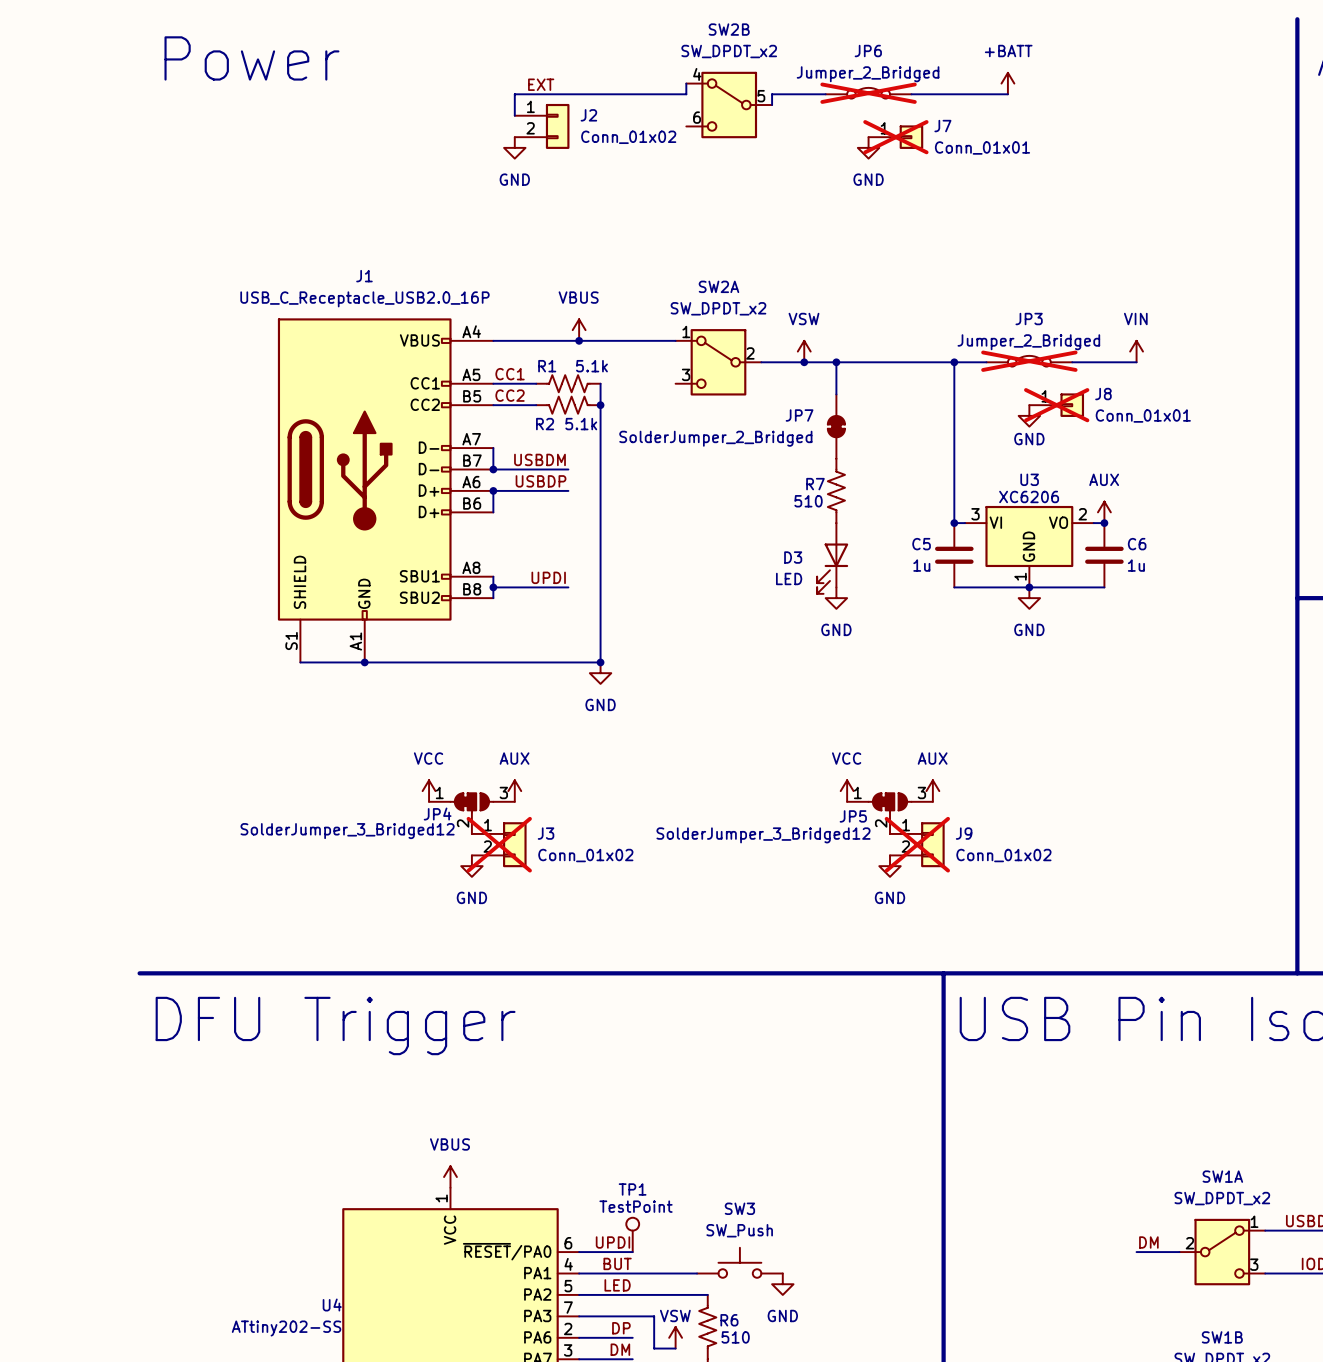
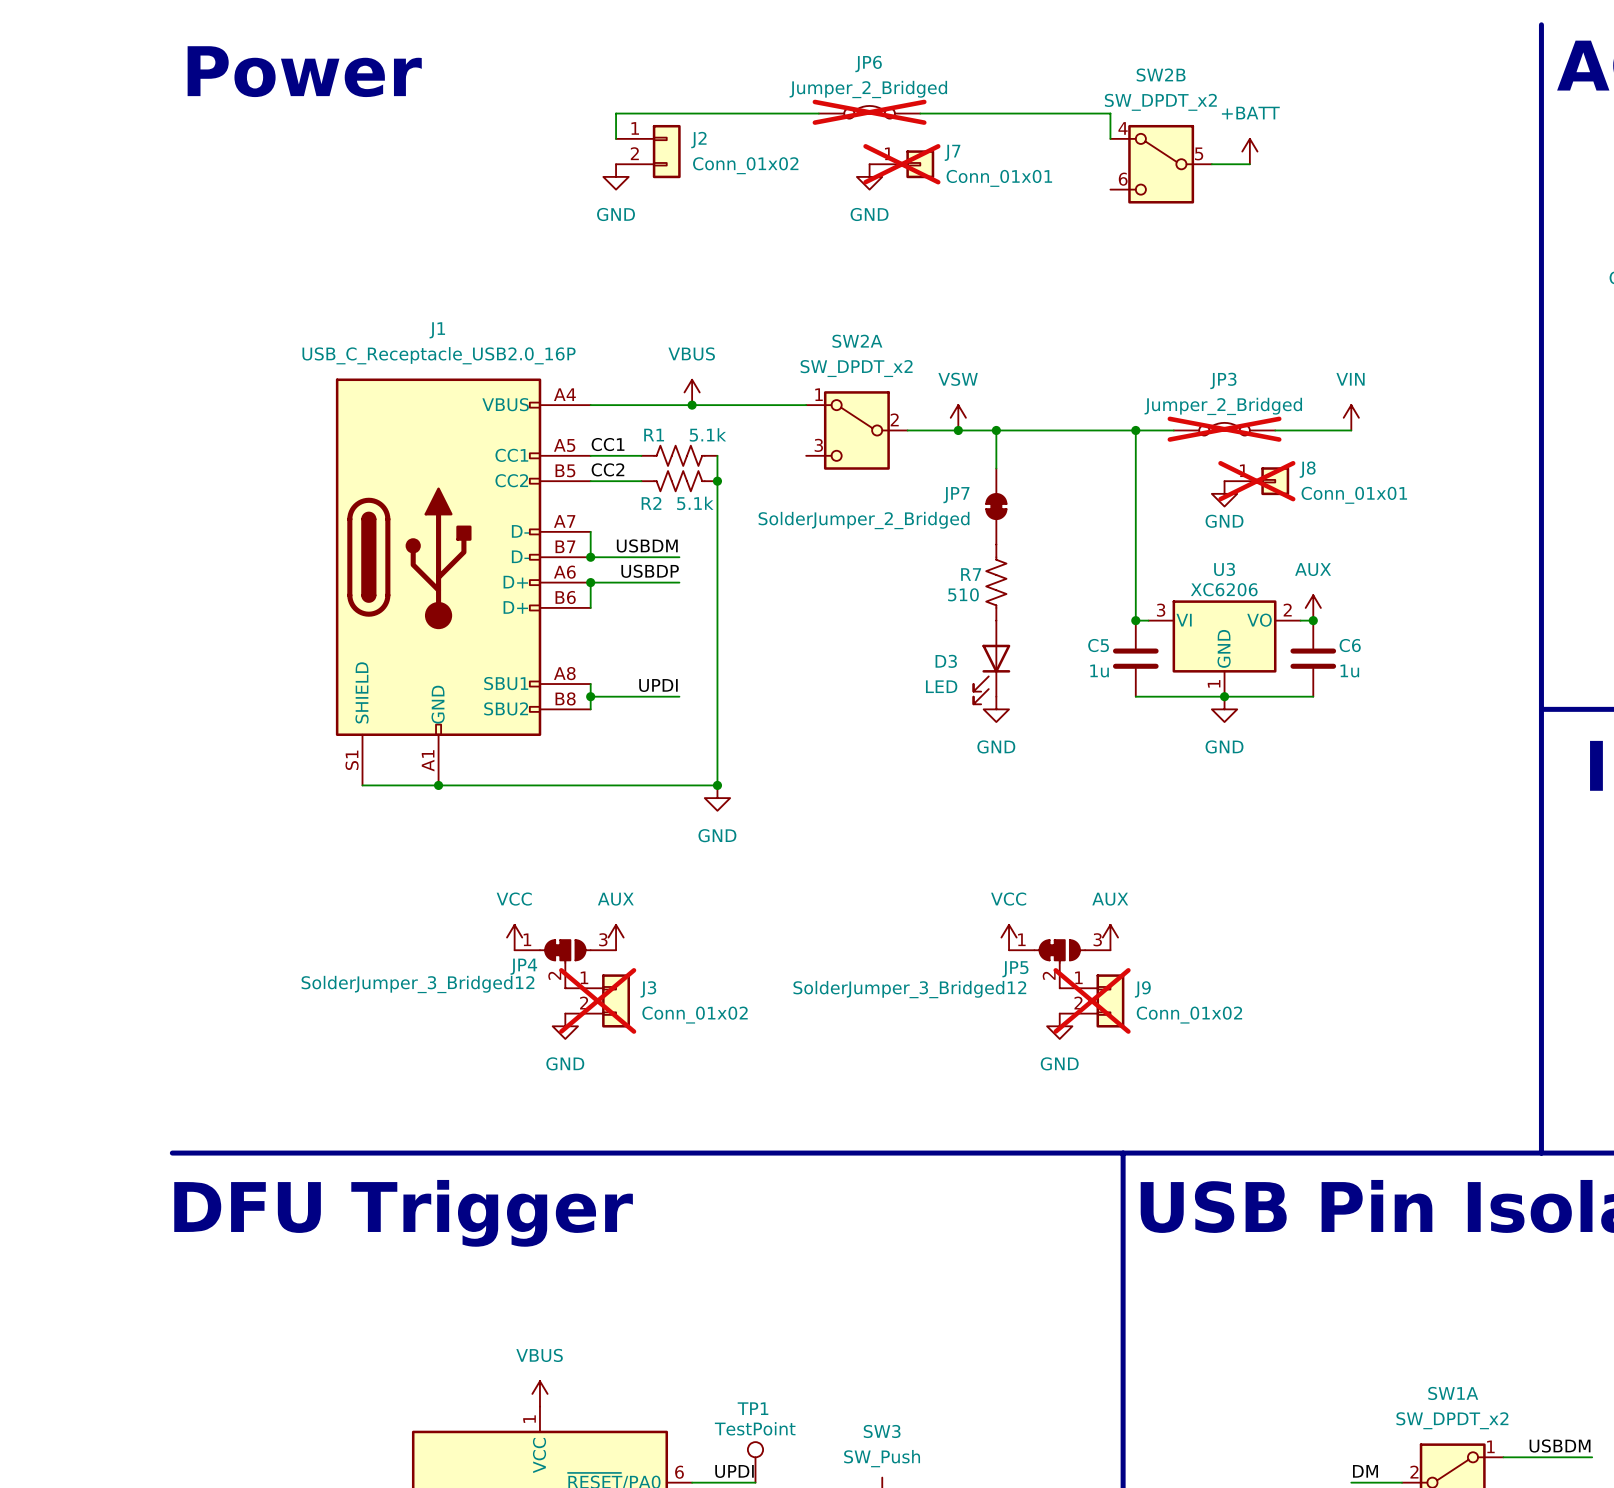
wire: (686, 83) (686, 94) -> none
power symbol position: +BATT (1007, 83) -> +BATT (1249, 151)
label: EXT (541, 84) -> none
JP6 position: (868, 93) -> (869, 112)
wire: (772, 94) (772, 105) -> none
wire: (932, 94) (1007, 94) -> (1110, 113) (1110, 138)
SW2B position: (729, 105) -> (1161, 164)
J7 position: (895, 137) -> (901, 164)
wire: none -> (1211, 164) (1249, 164)
power symbol position: GND (868, 147) -> GND (869, 176)

